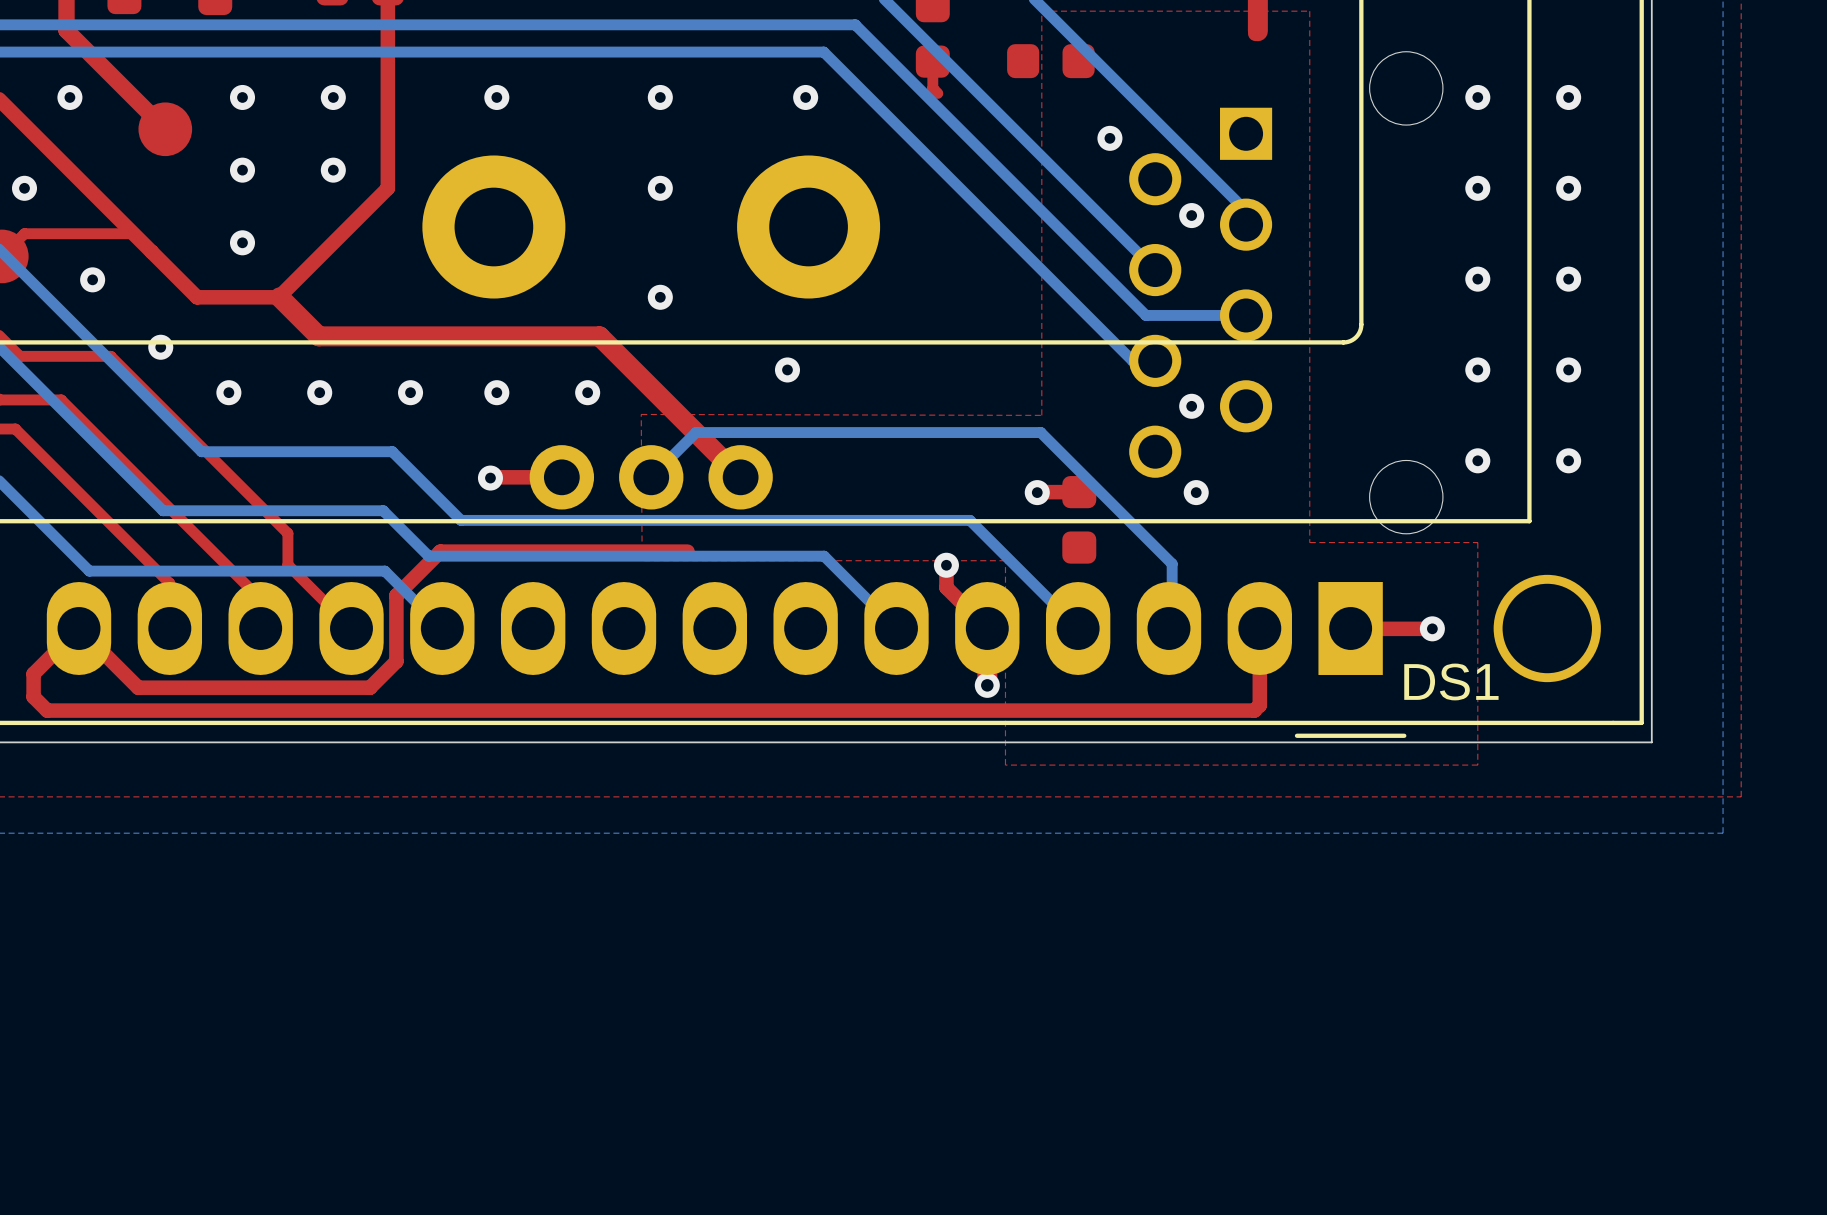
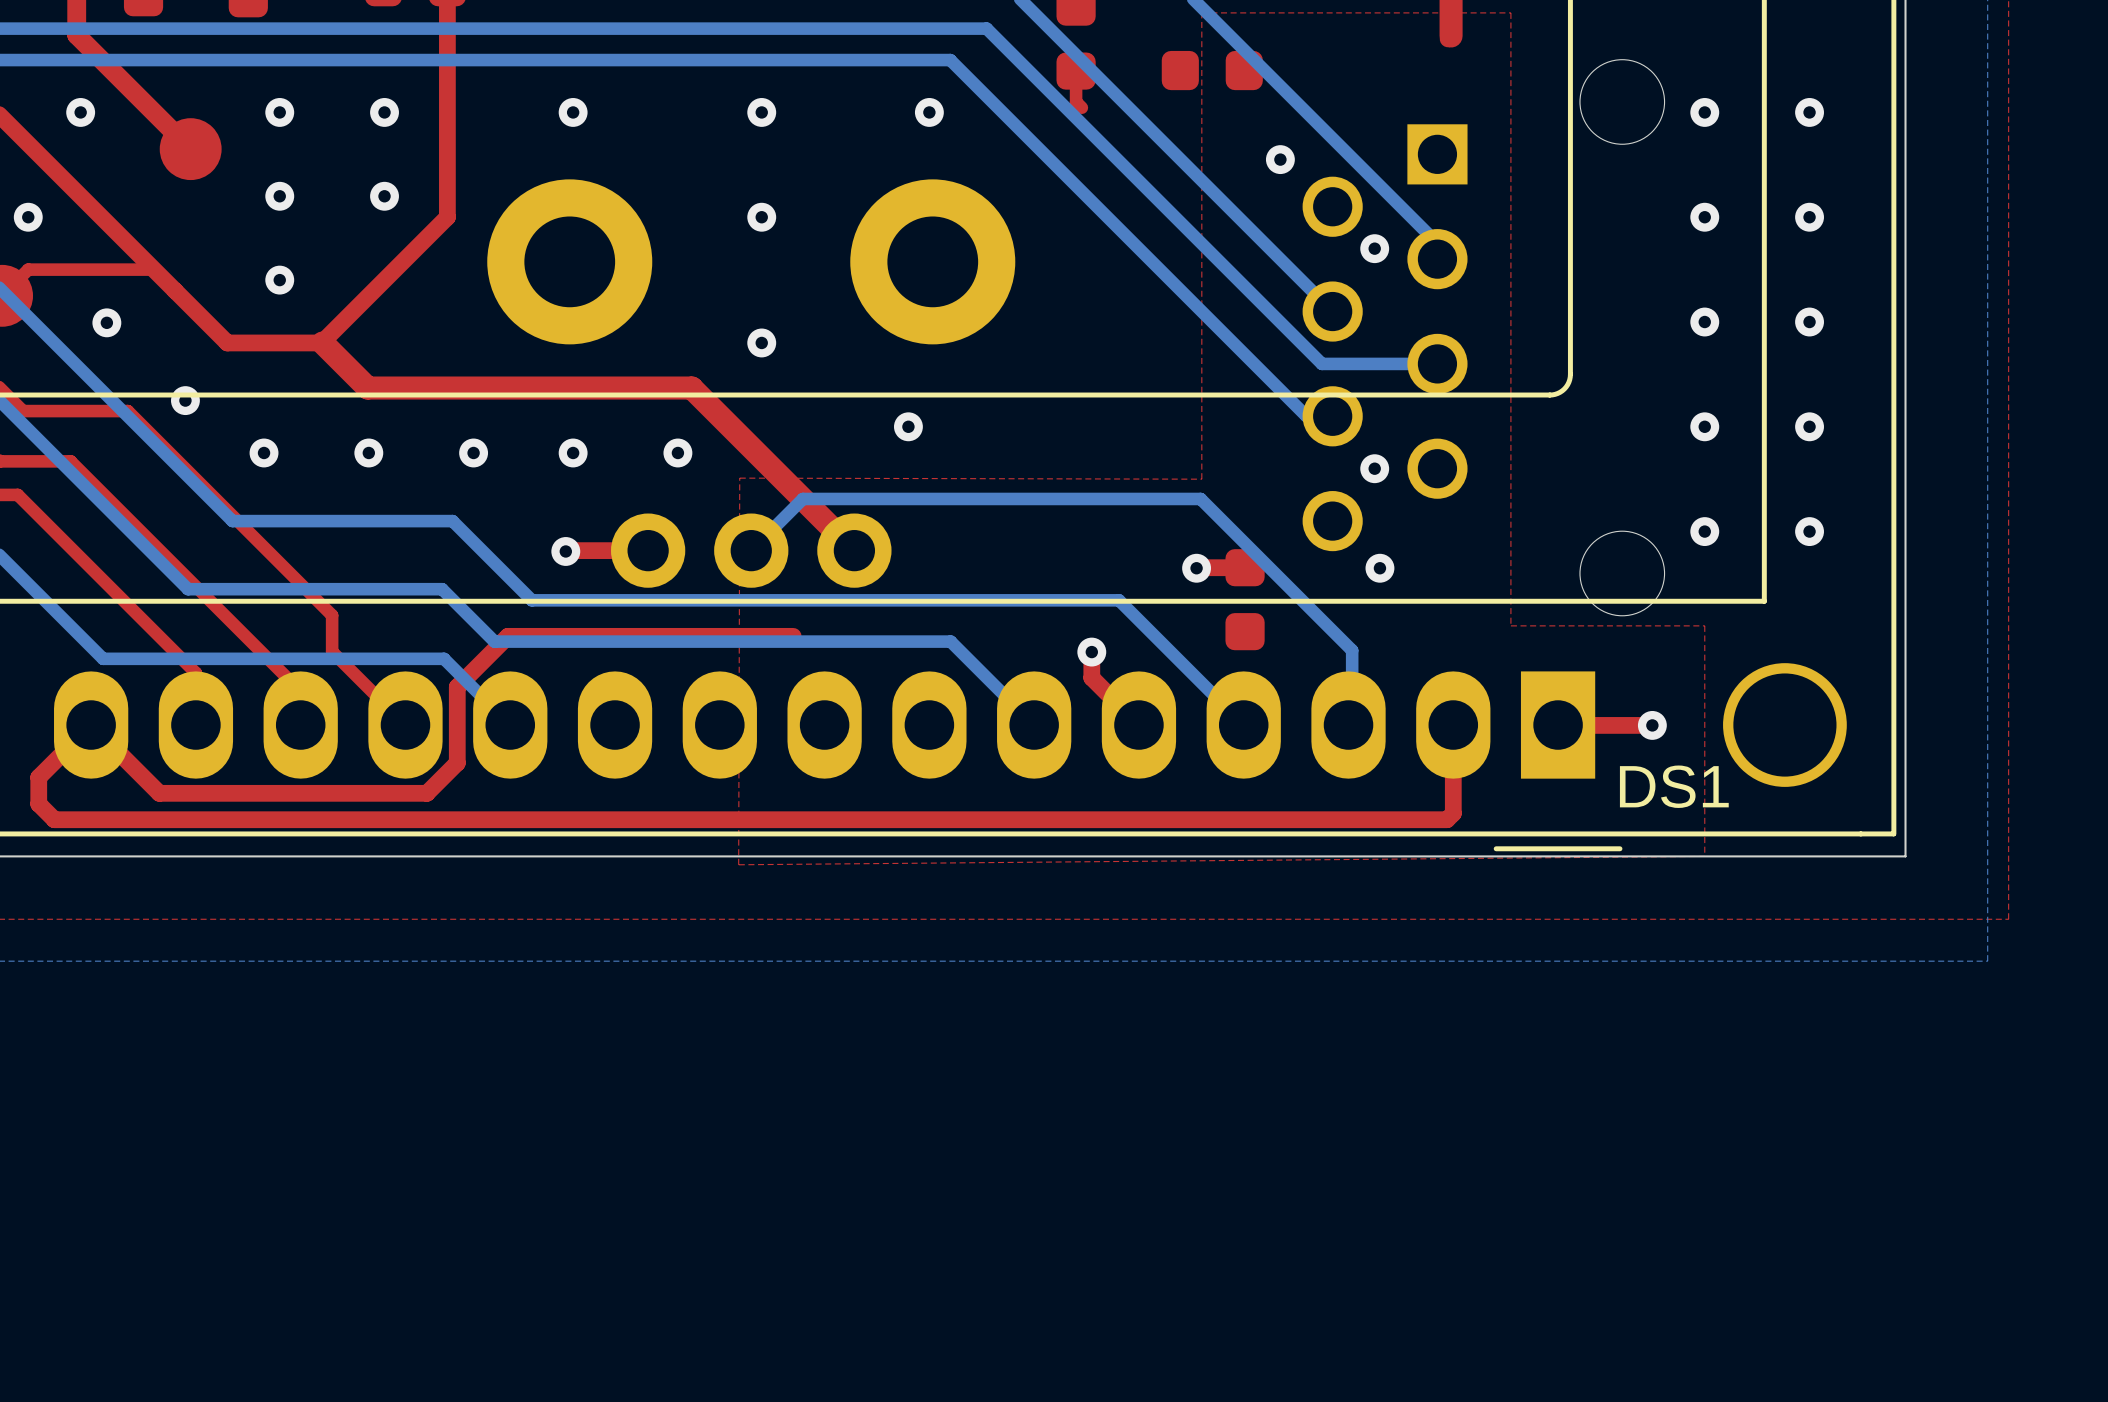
top zone outline: (641, 414) (642, 560) (1005, 560) (1005, 765) (1477, 765) (1477, 742) -> (739, 478) (738, 864) (1704, 856)
via: (987, 685) -> none

